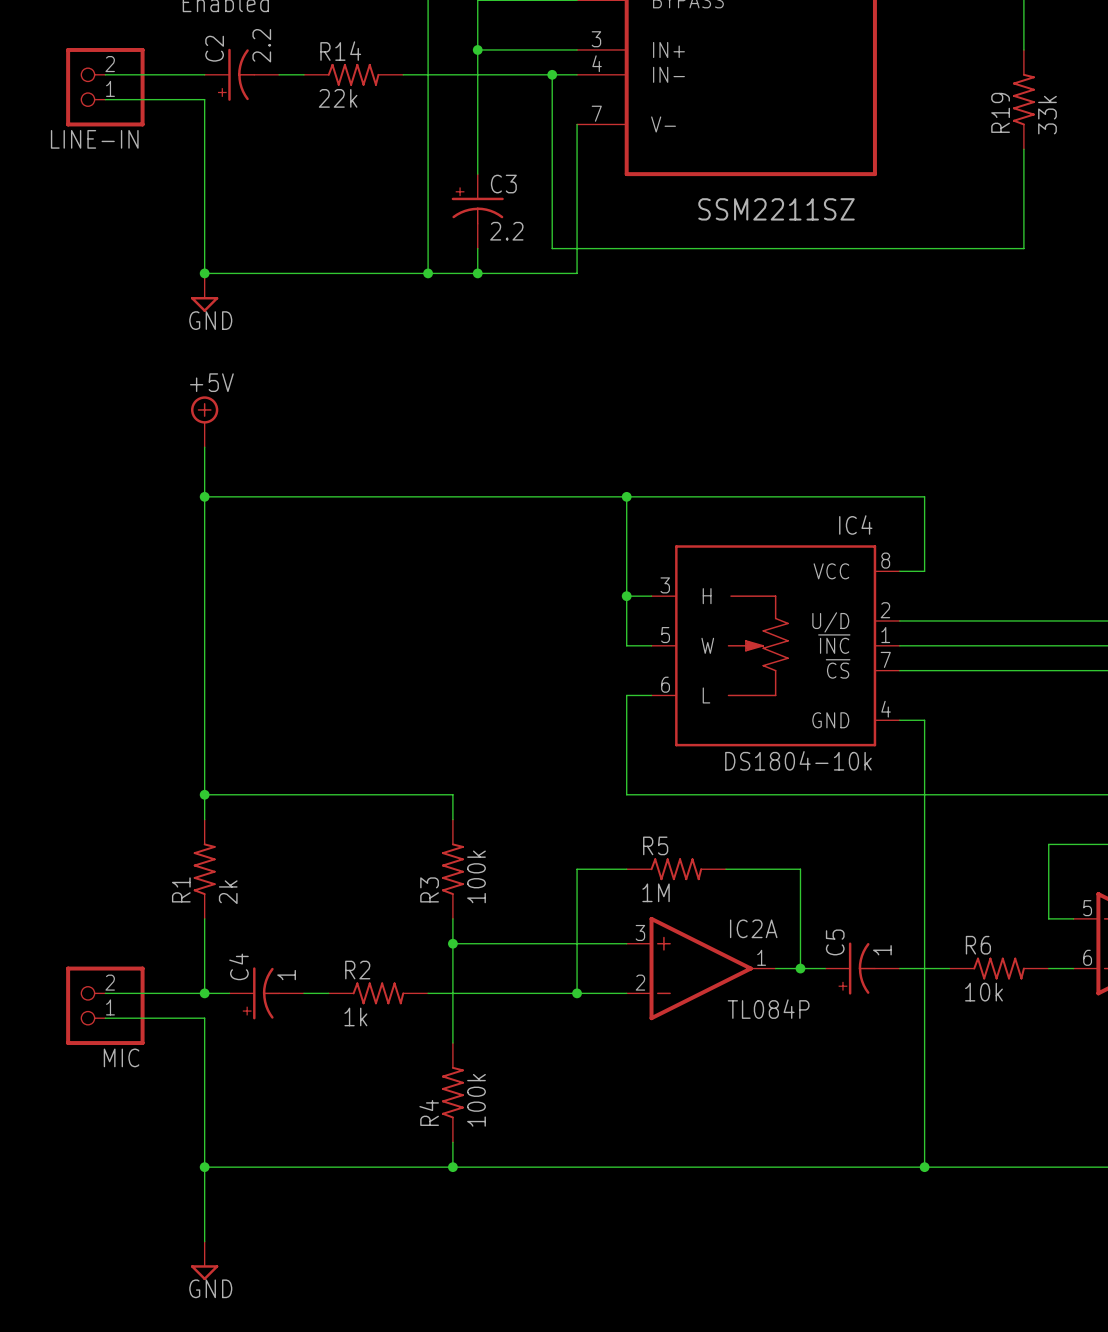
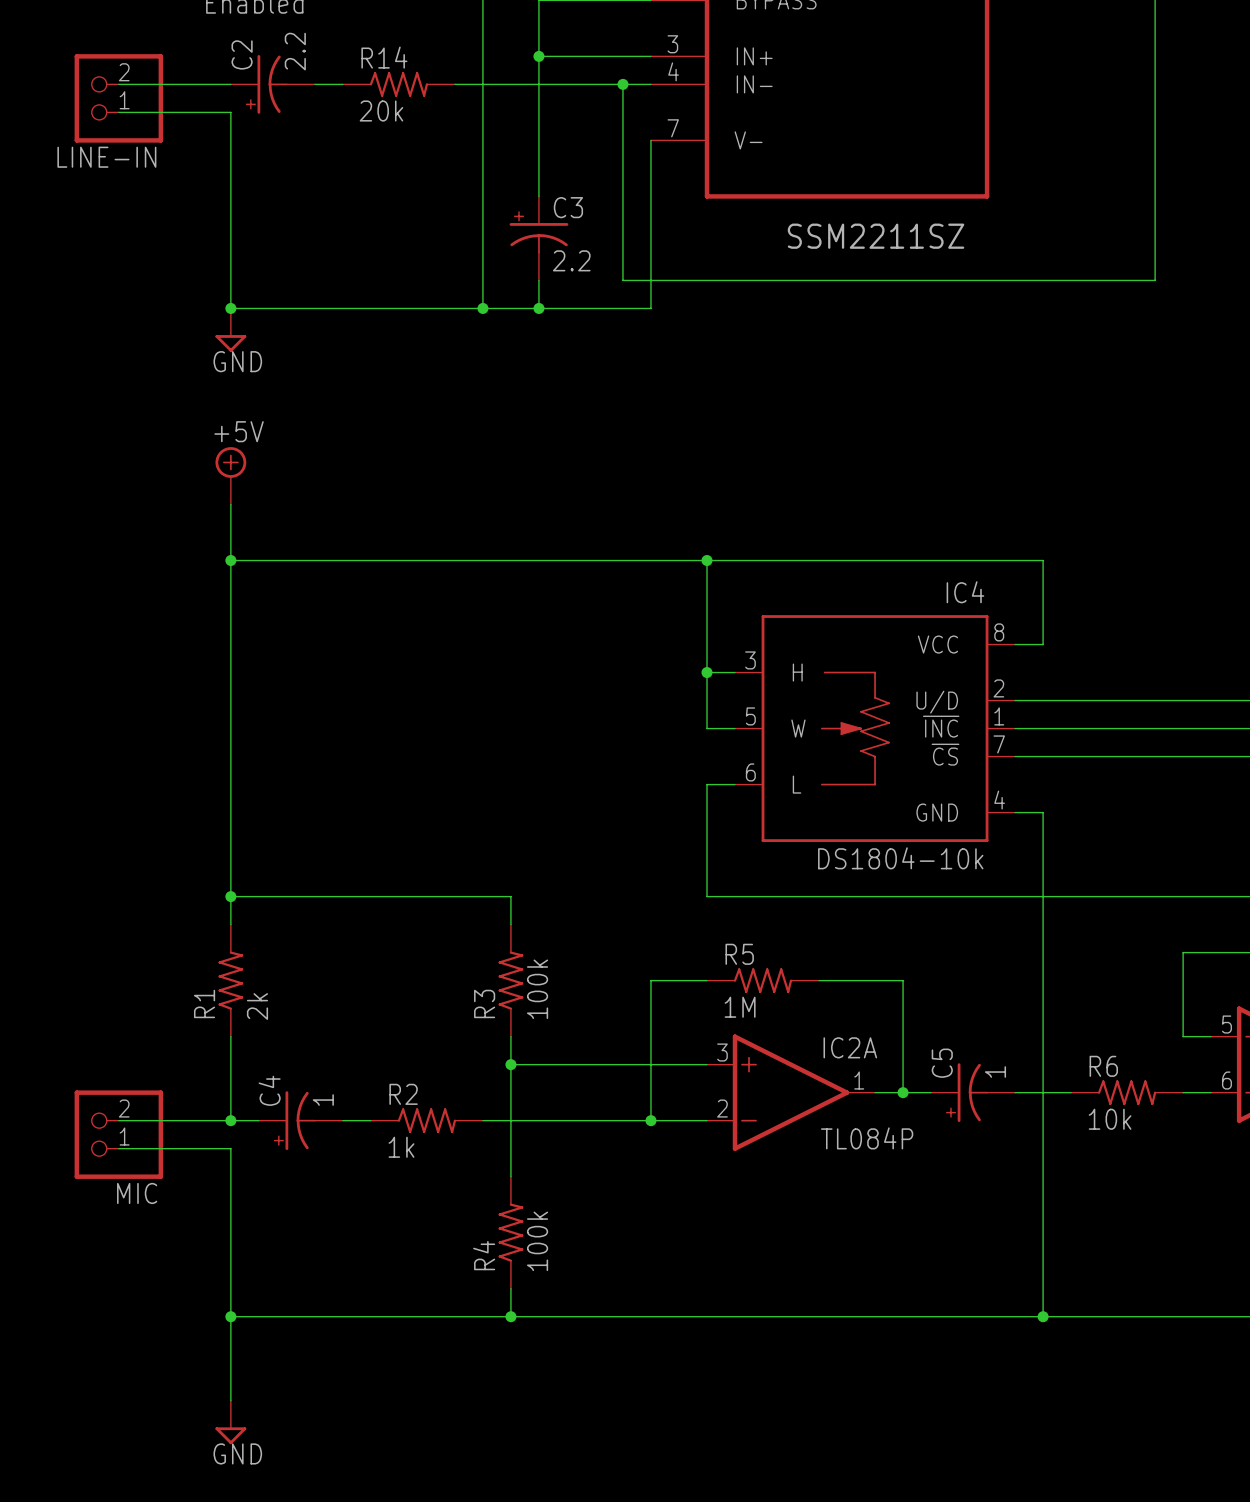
R14 value: 22k (338, 98) -> 20k (381, 111)
R19: 33k (1023, 99) -> none

